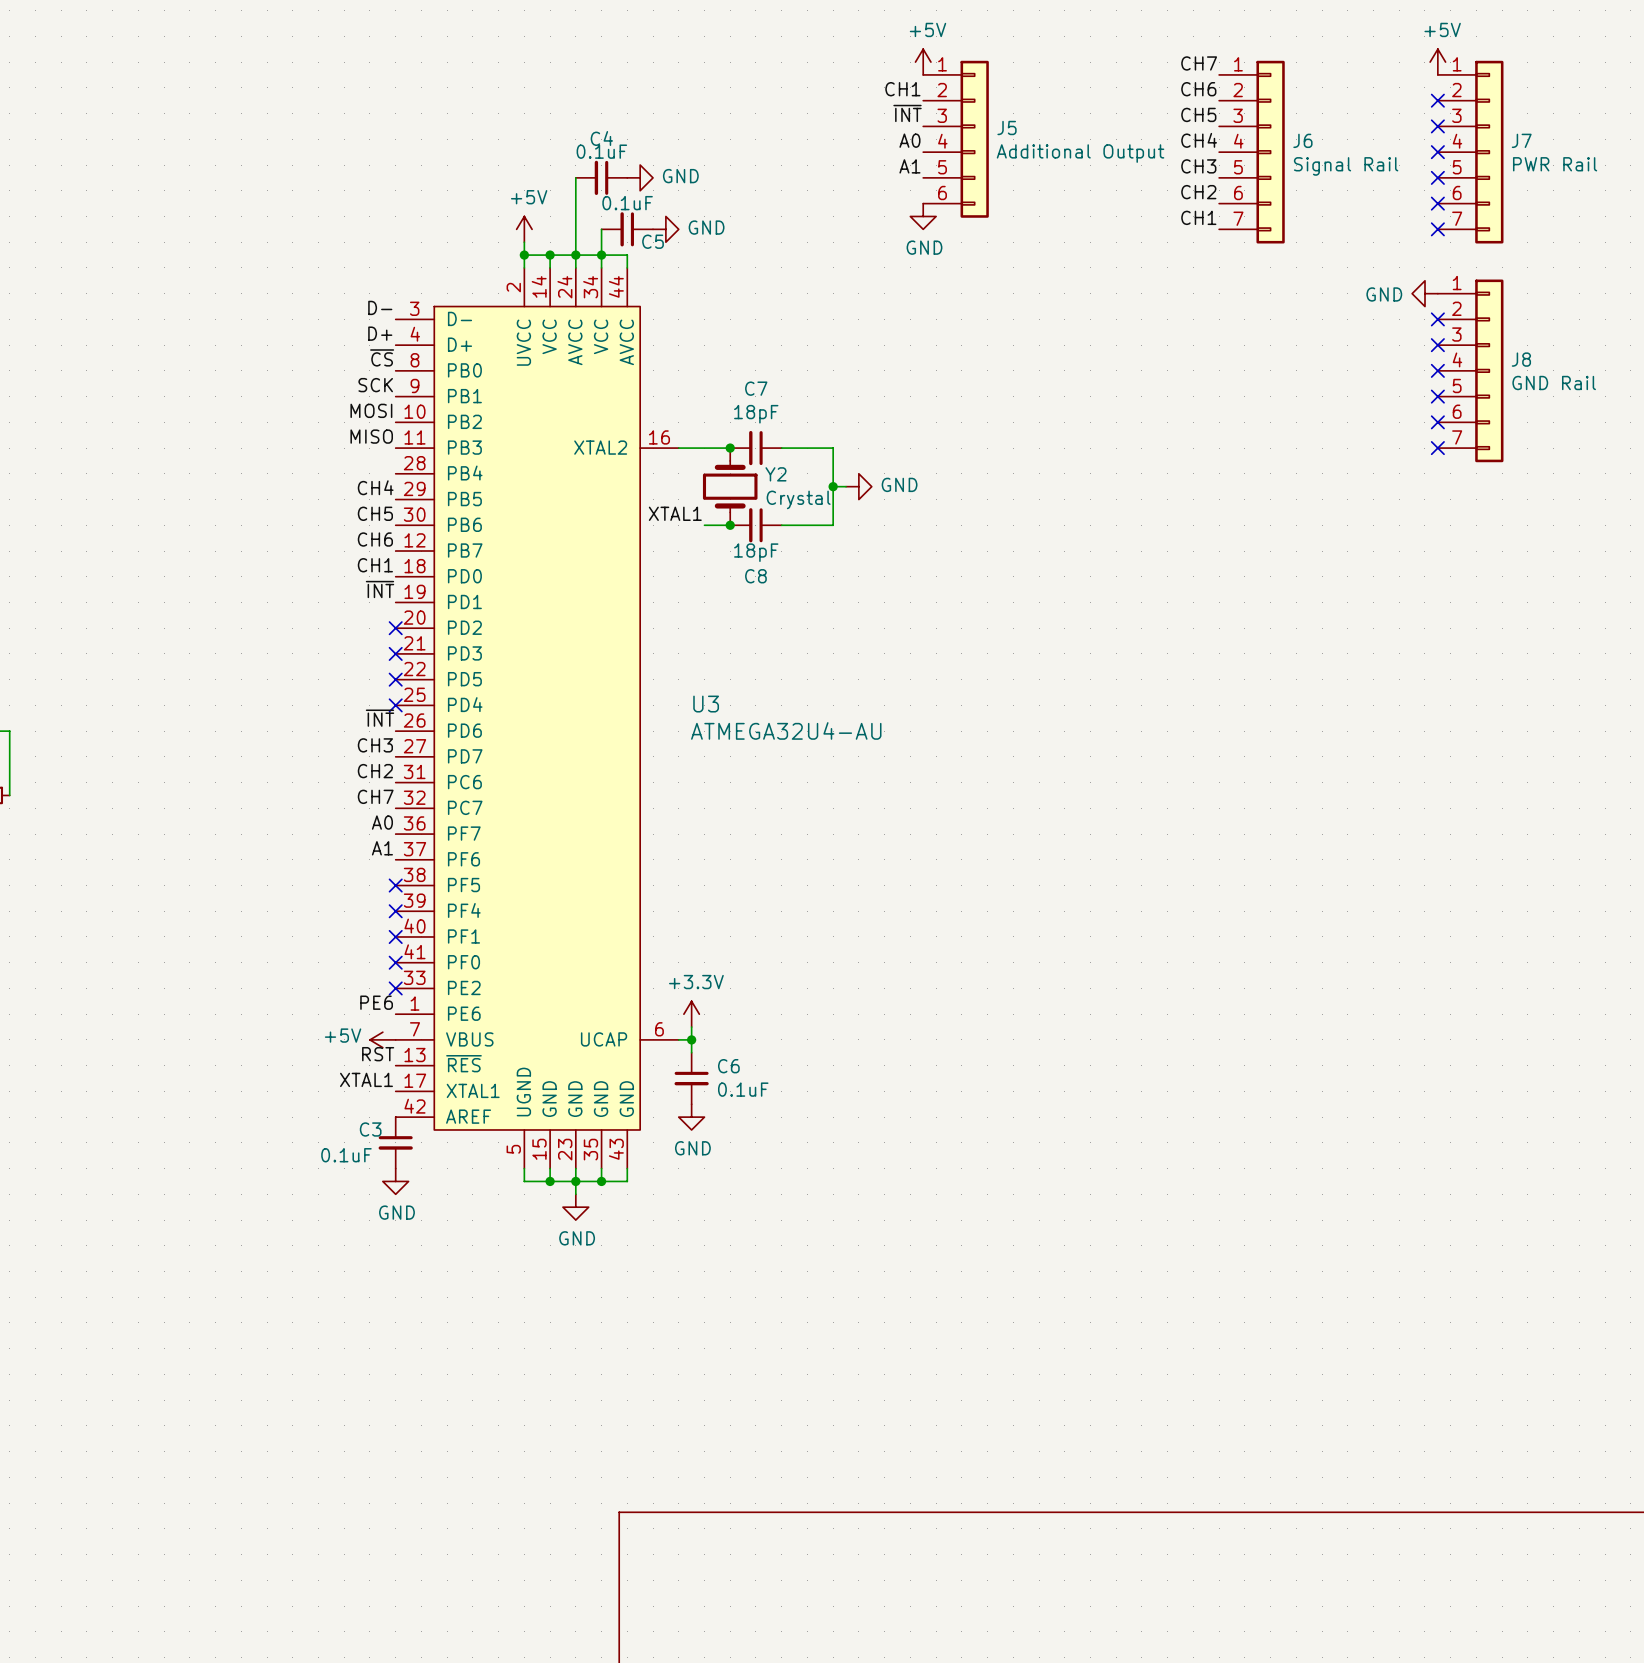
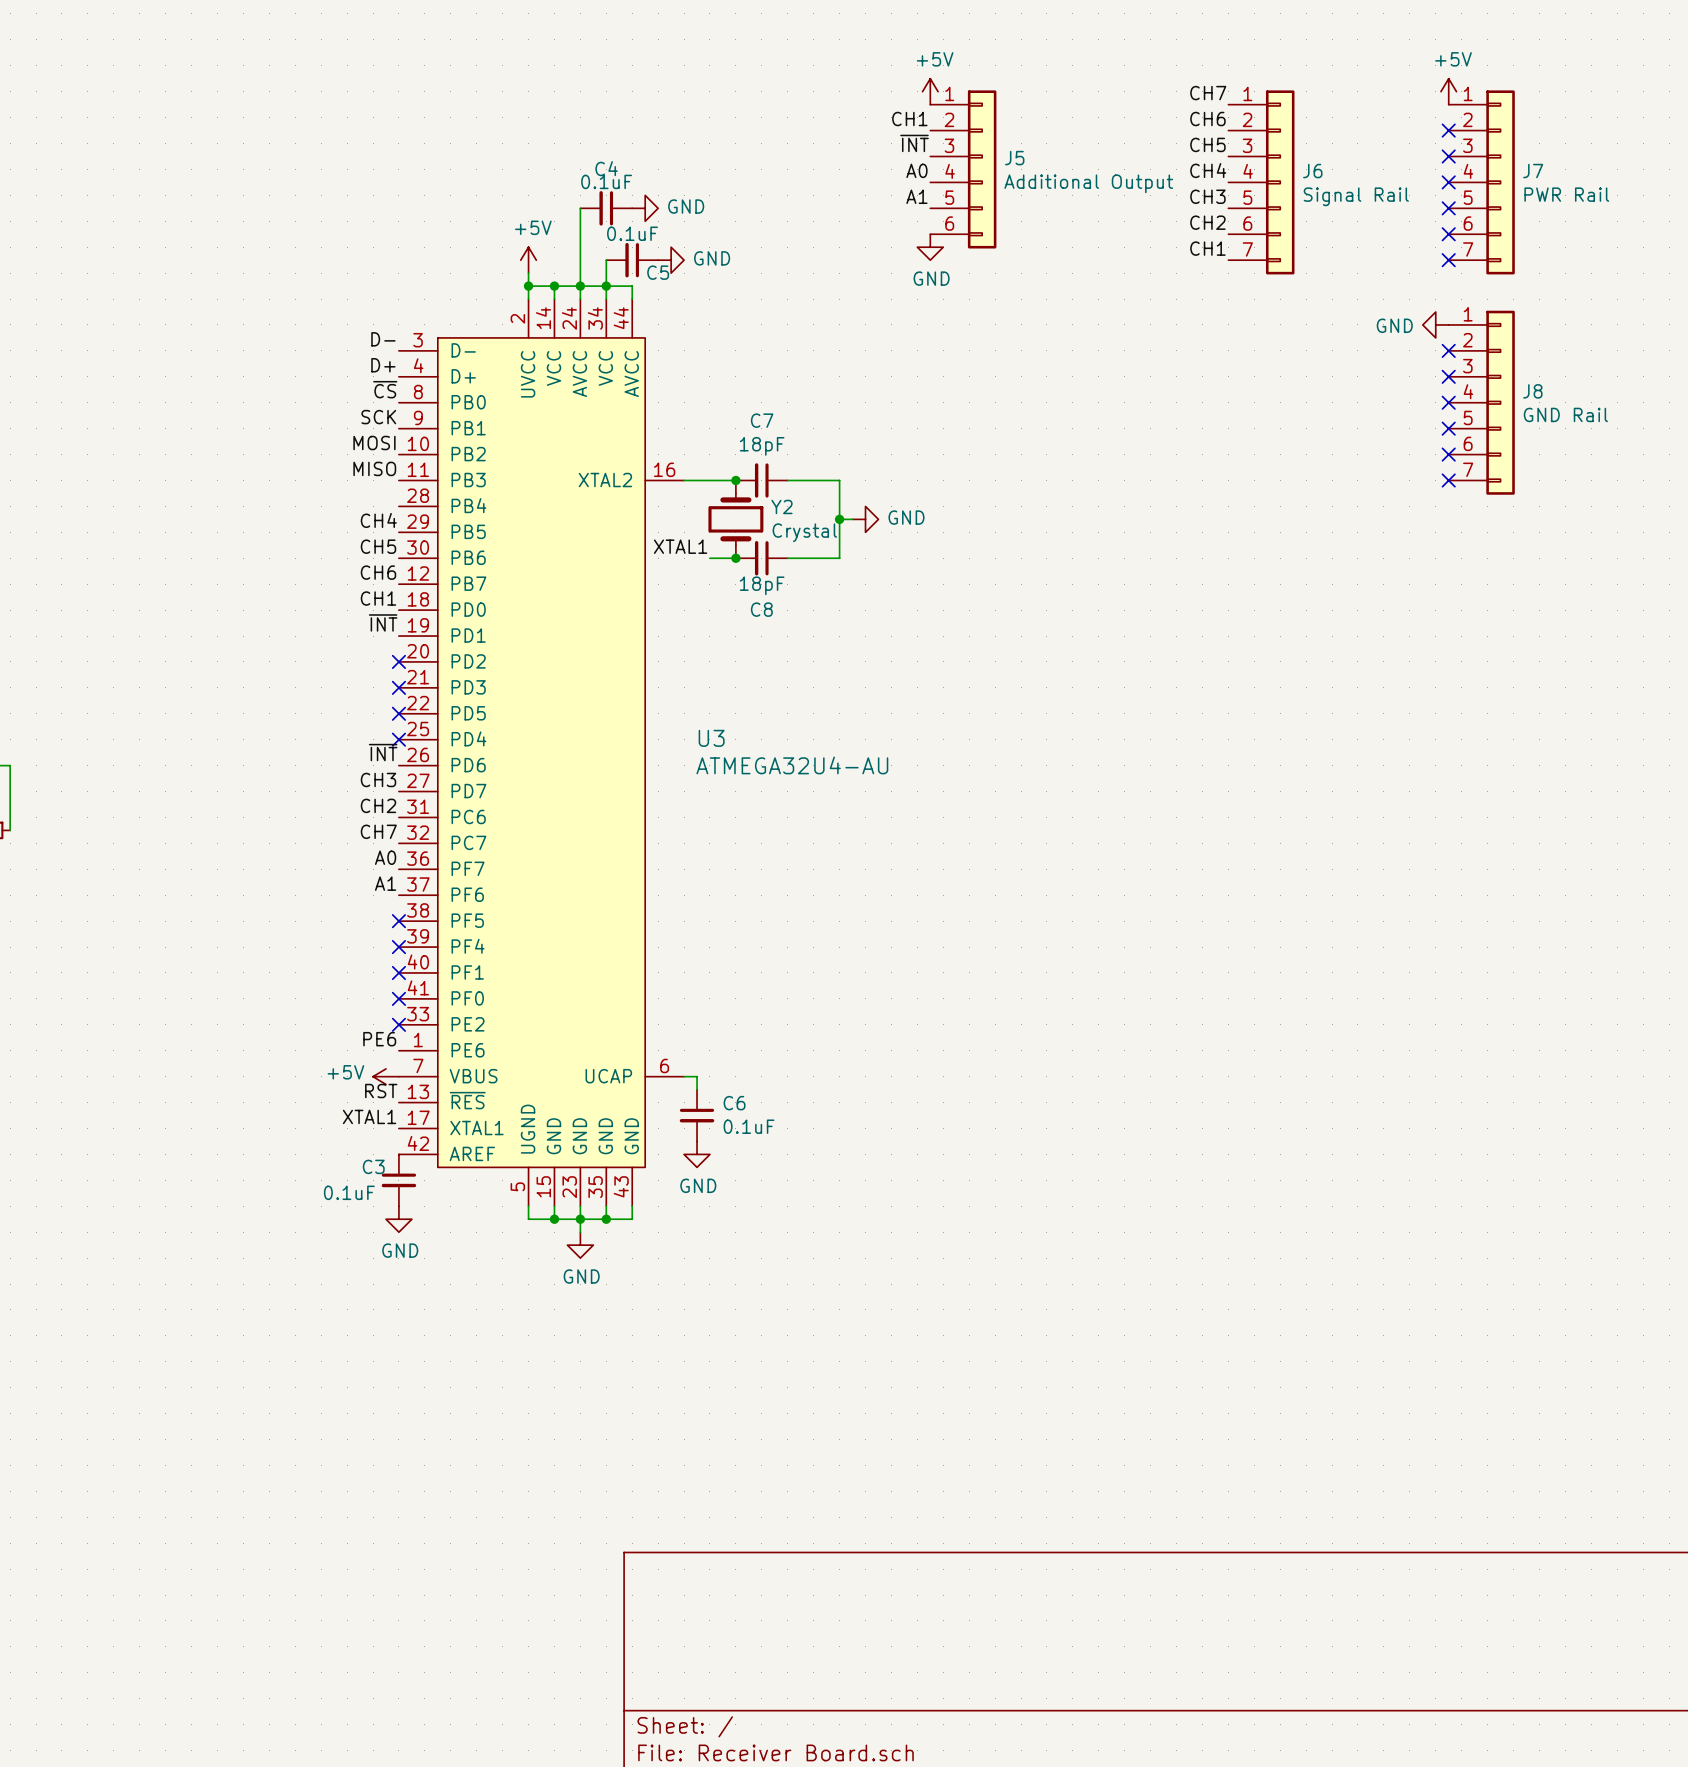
power symbol: +3.3V (691, 1014) -> none
wire: (691, 1027) (691, 1039) -> none
junction: (691, 1039) -> none

